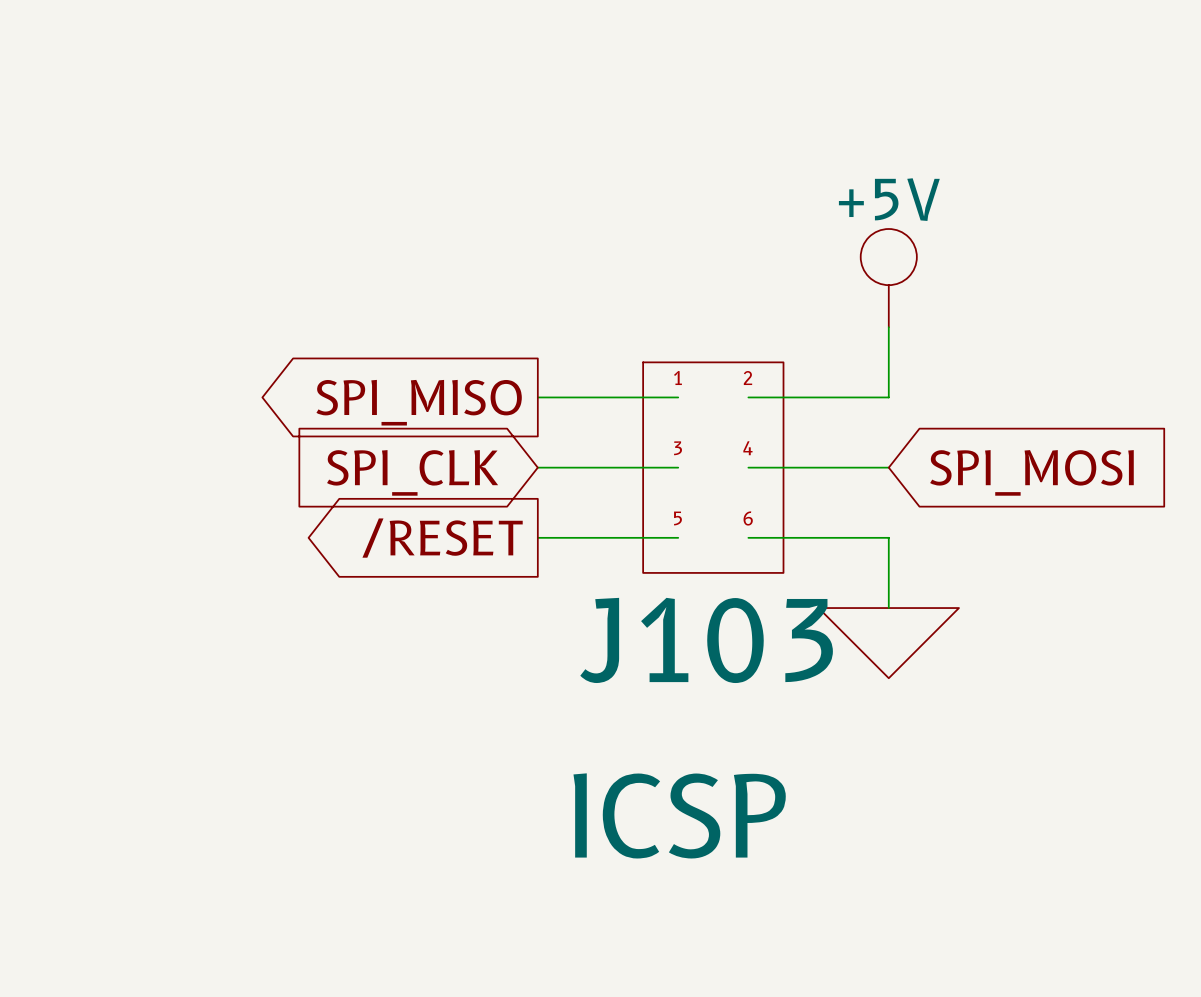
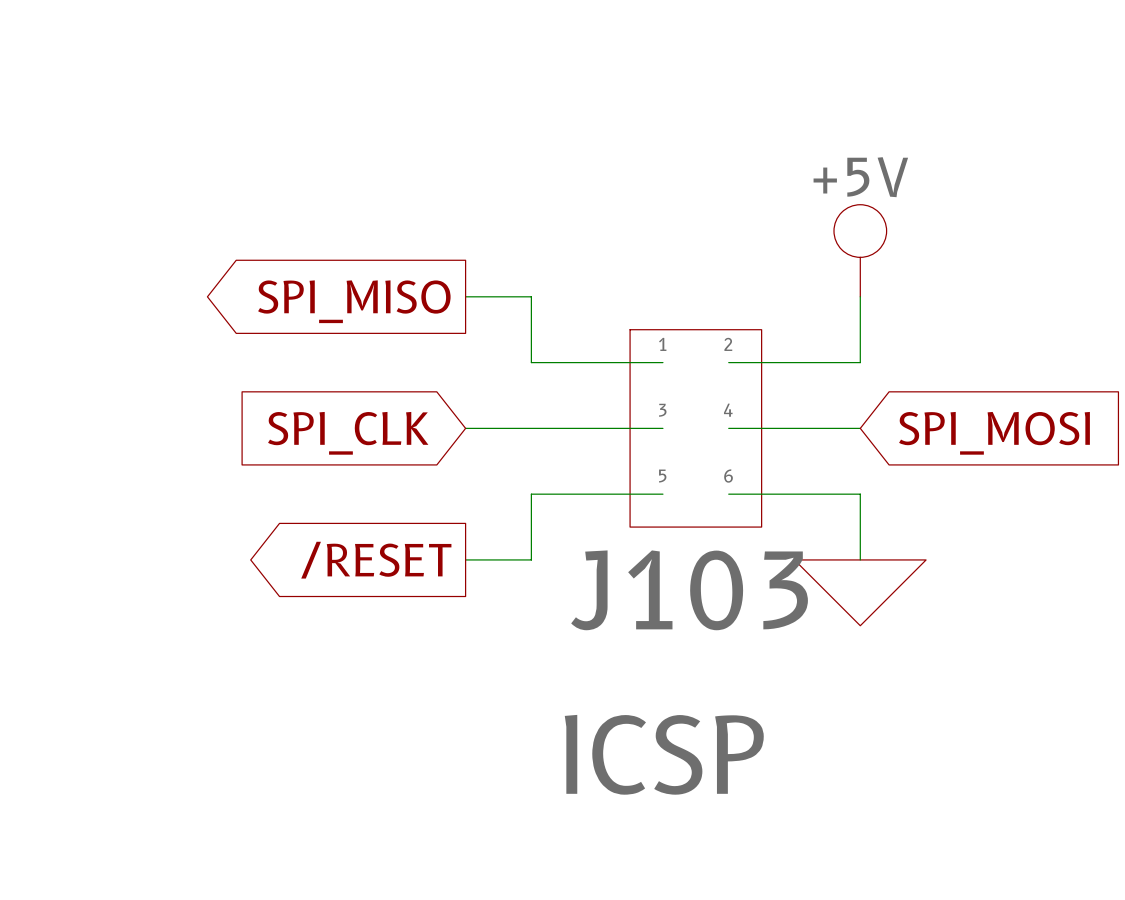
wire: none -> (465, 296) (531, 296) (531, 362)
global label position: SPI_MISO (419, 402) -> SPI_MISO (354, 301)
wire: none -> (465, 428) (531, 428)
global label position: SPI_CLK (412, 472) -> SPI_CLK (348, 433)
wire: none -> (531, 494) (531, 559) (465, 559)
global label position: /RESET (442, 538) -> /RESET (376, 560)

